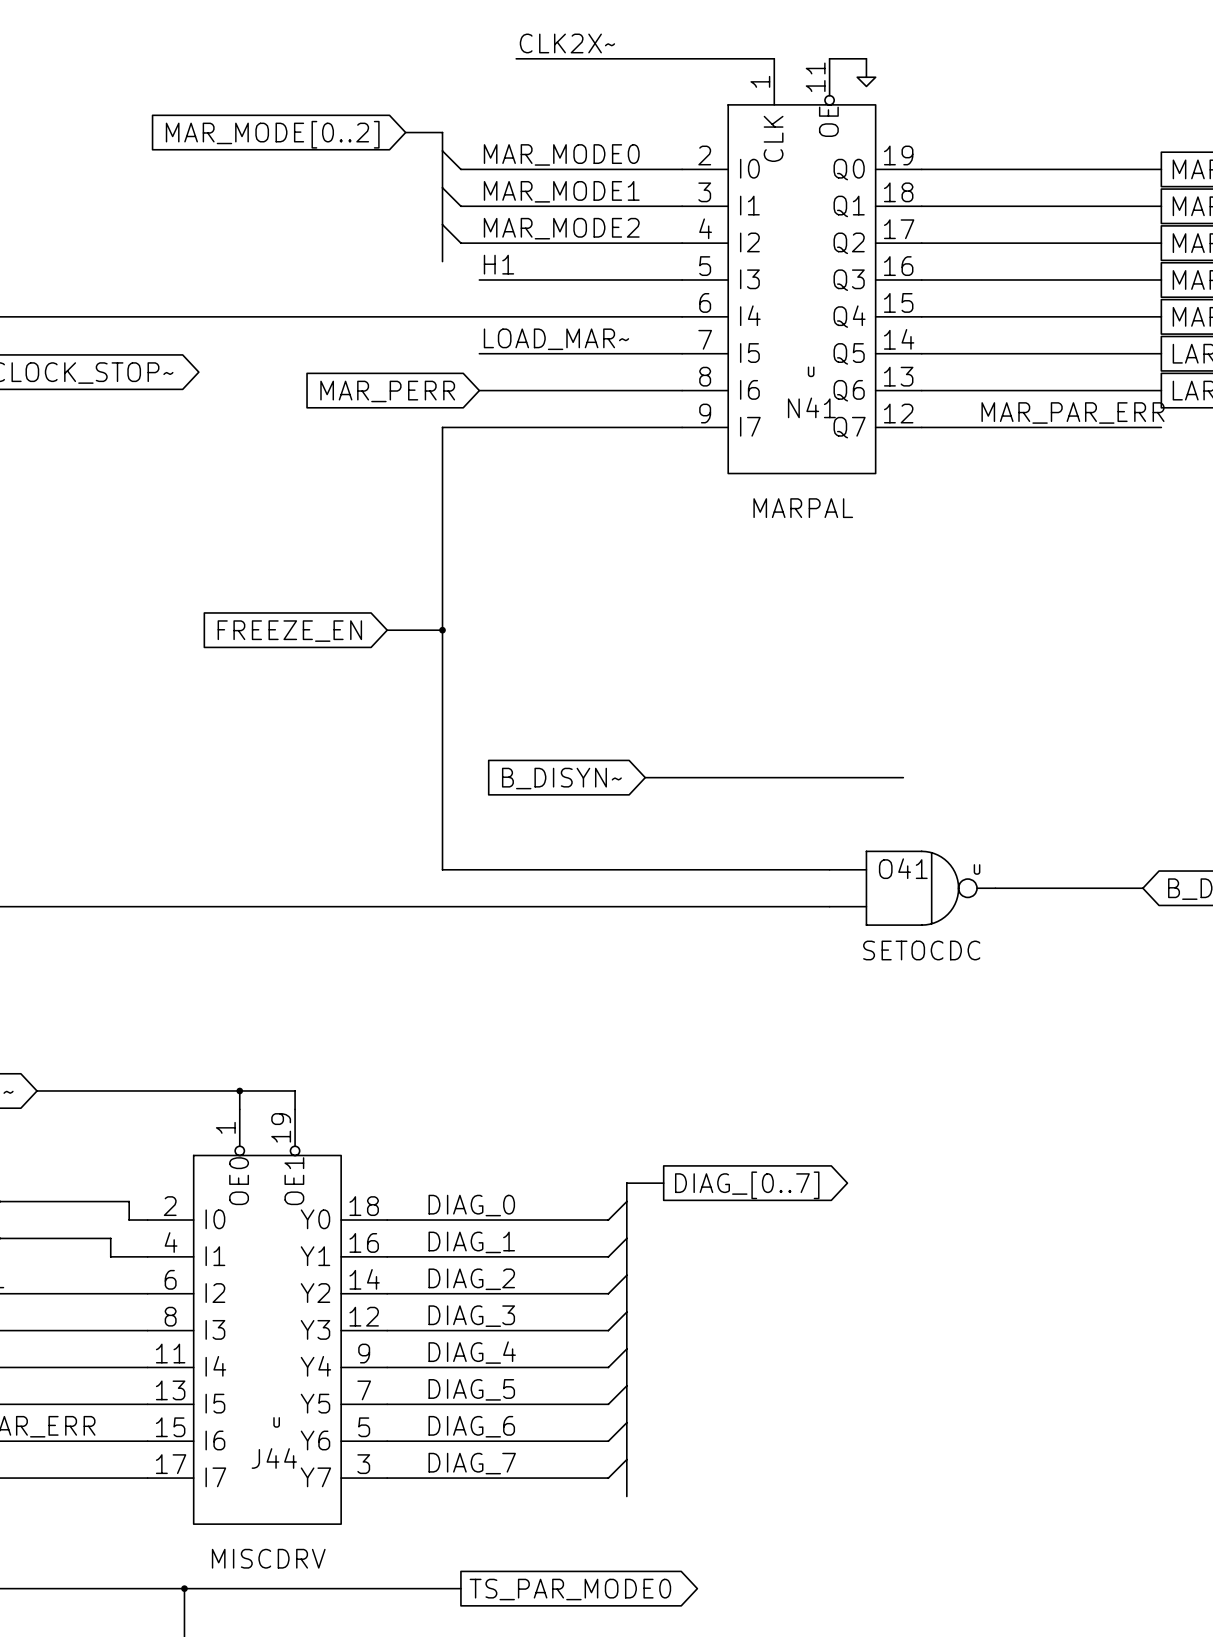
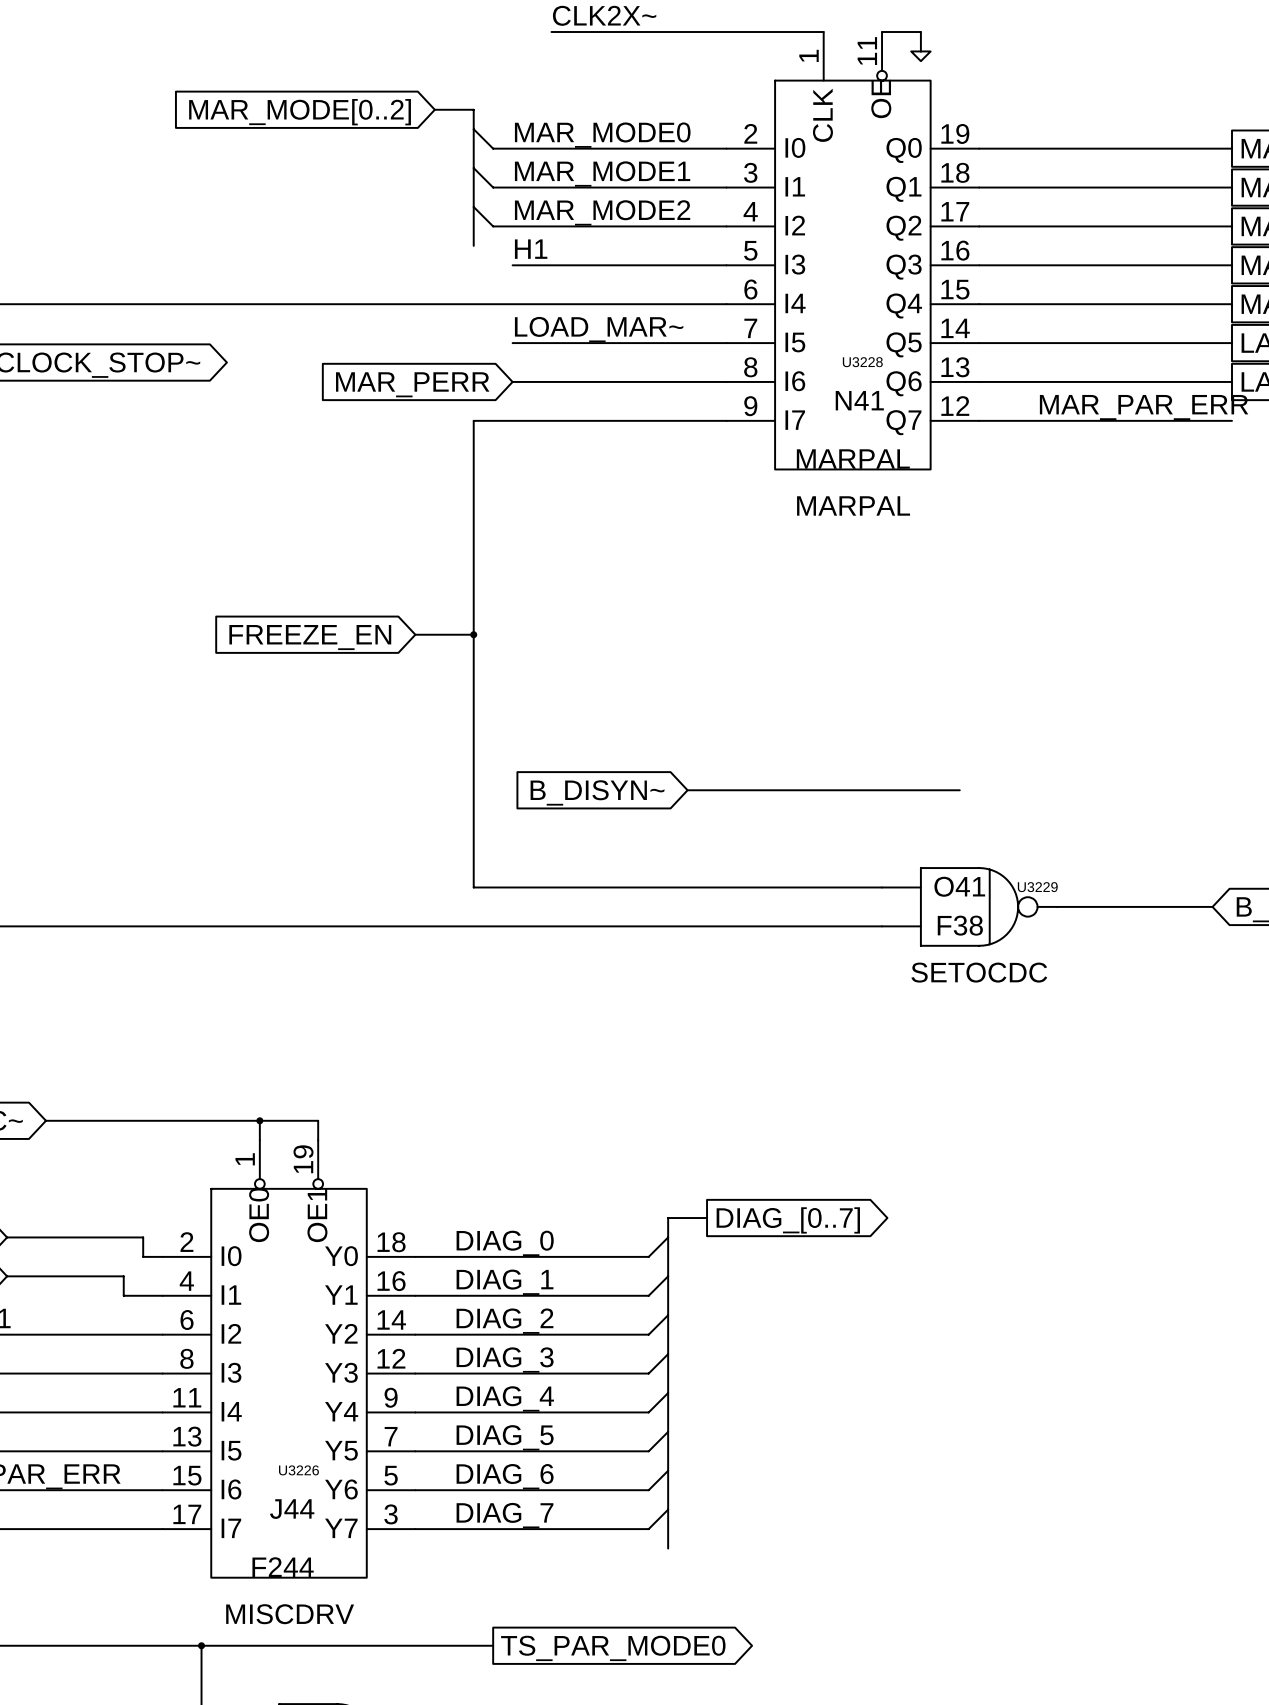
U name: U (811, 371) -> U3228 (862, 362)
U value: none -> MARPAL (853, 459)
U name: U (977, 869) -> U3229 (1037, 887)
U value: none -> F38 (960, 925)
U name: U (276, 1422) -> U3226 (298, 1470)
U value: none -> F244 (283, 1567)

